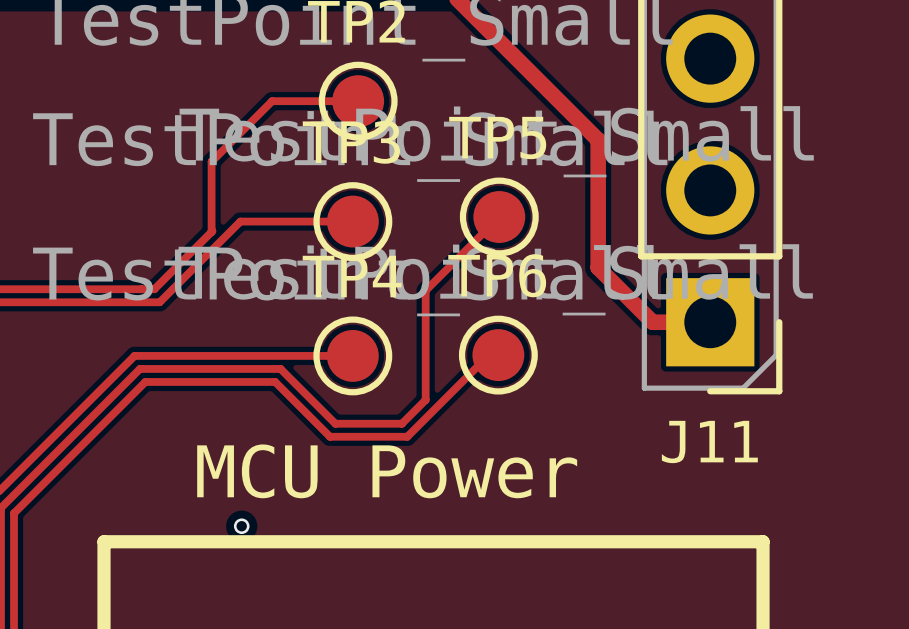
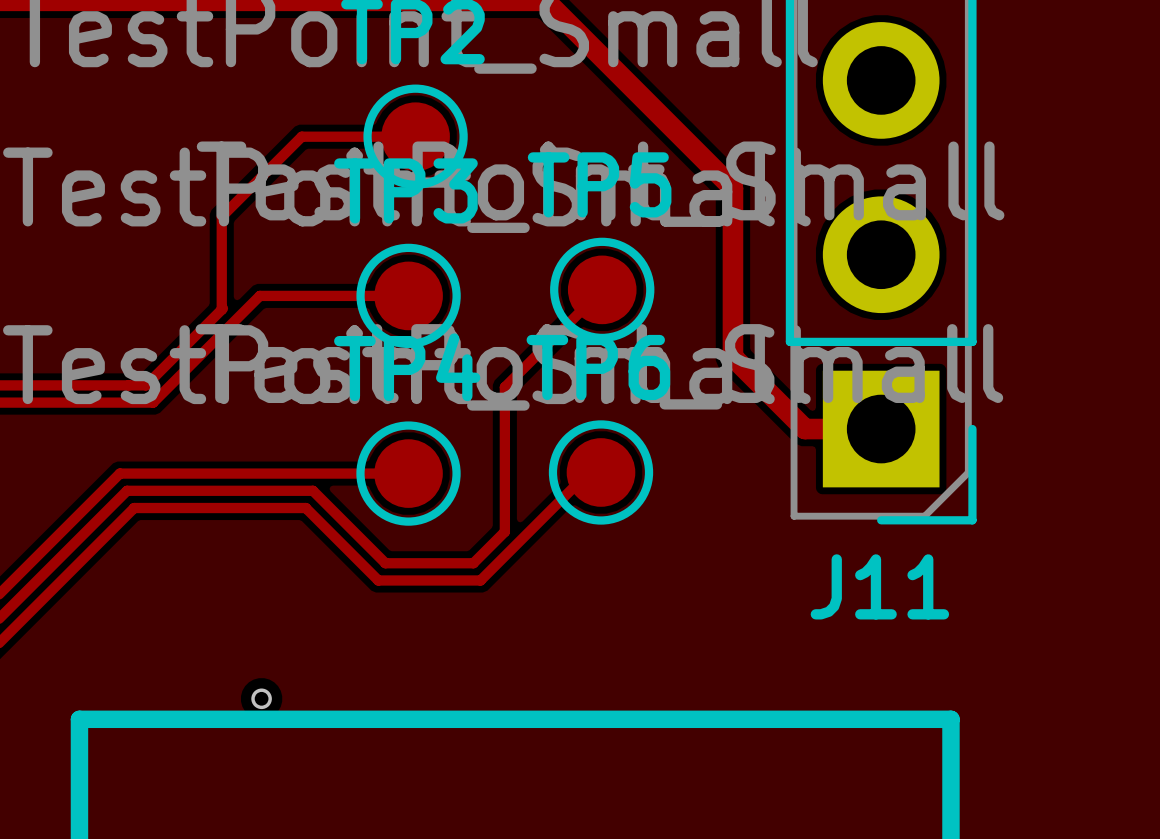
text: MCU Power (387, 471) -> none

